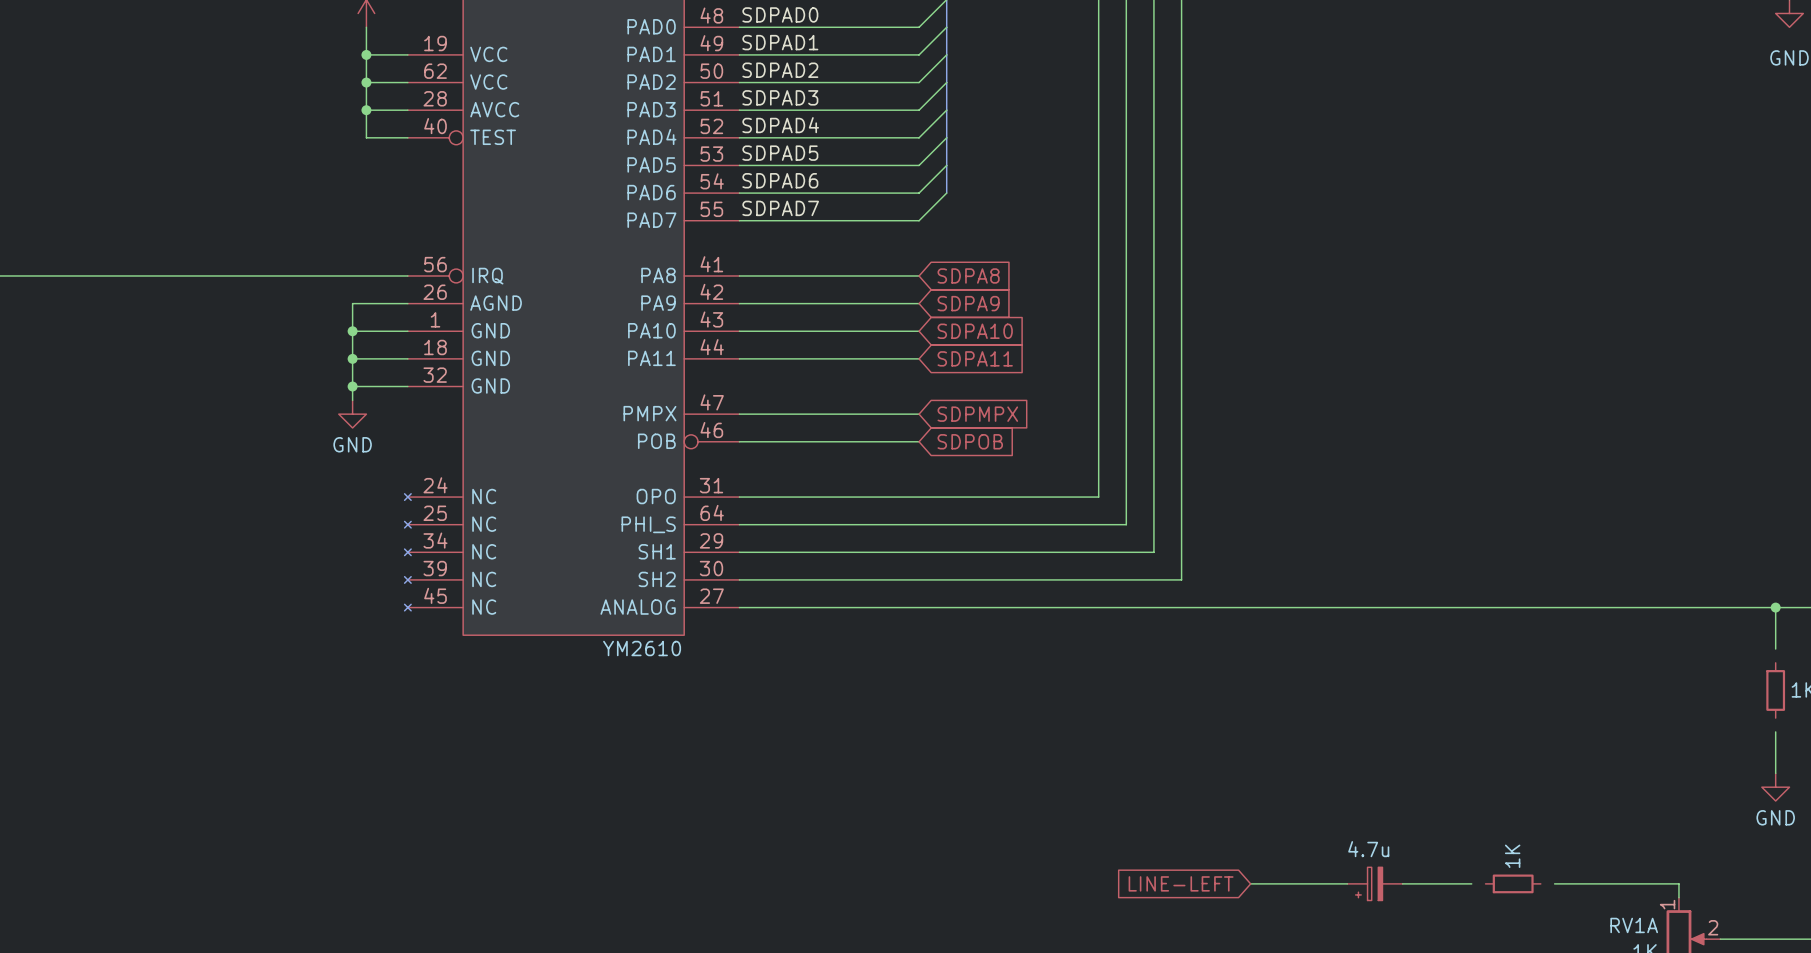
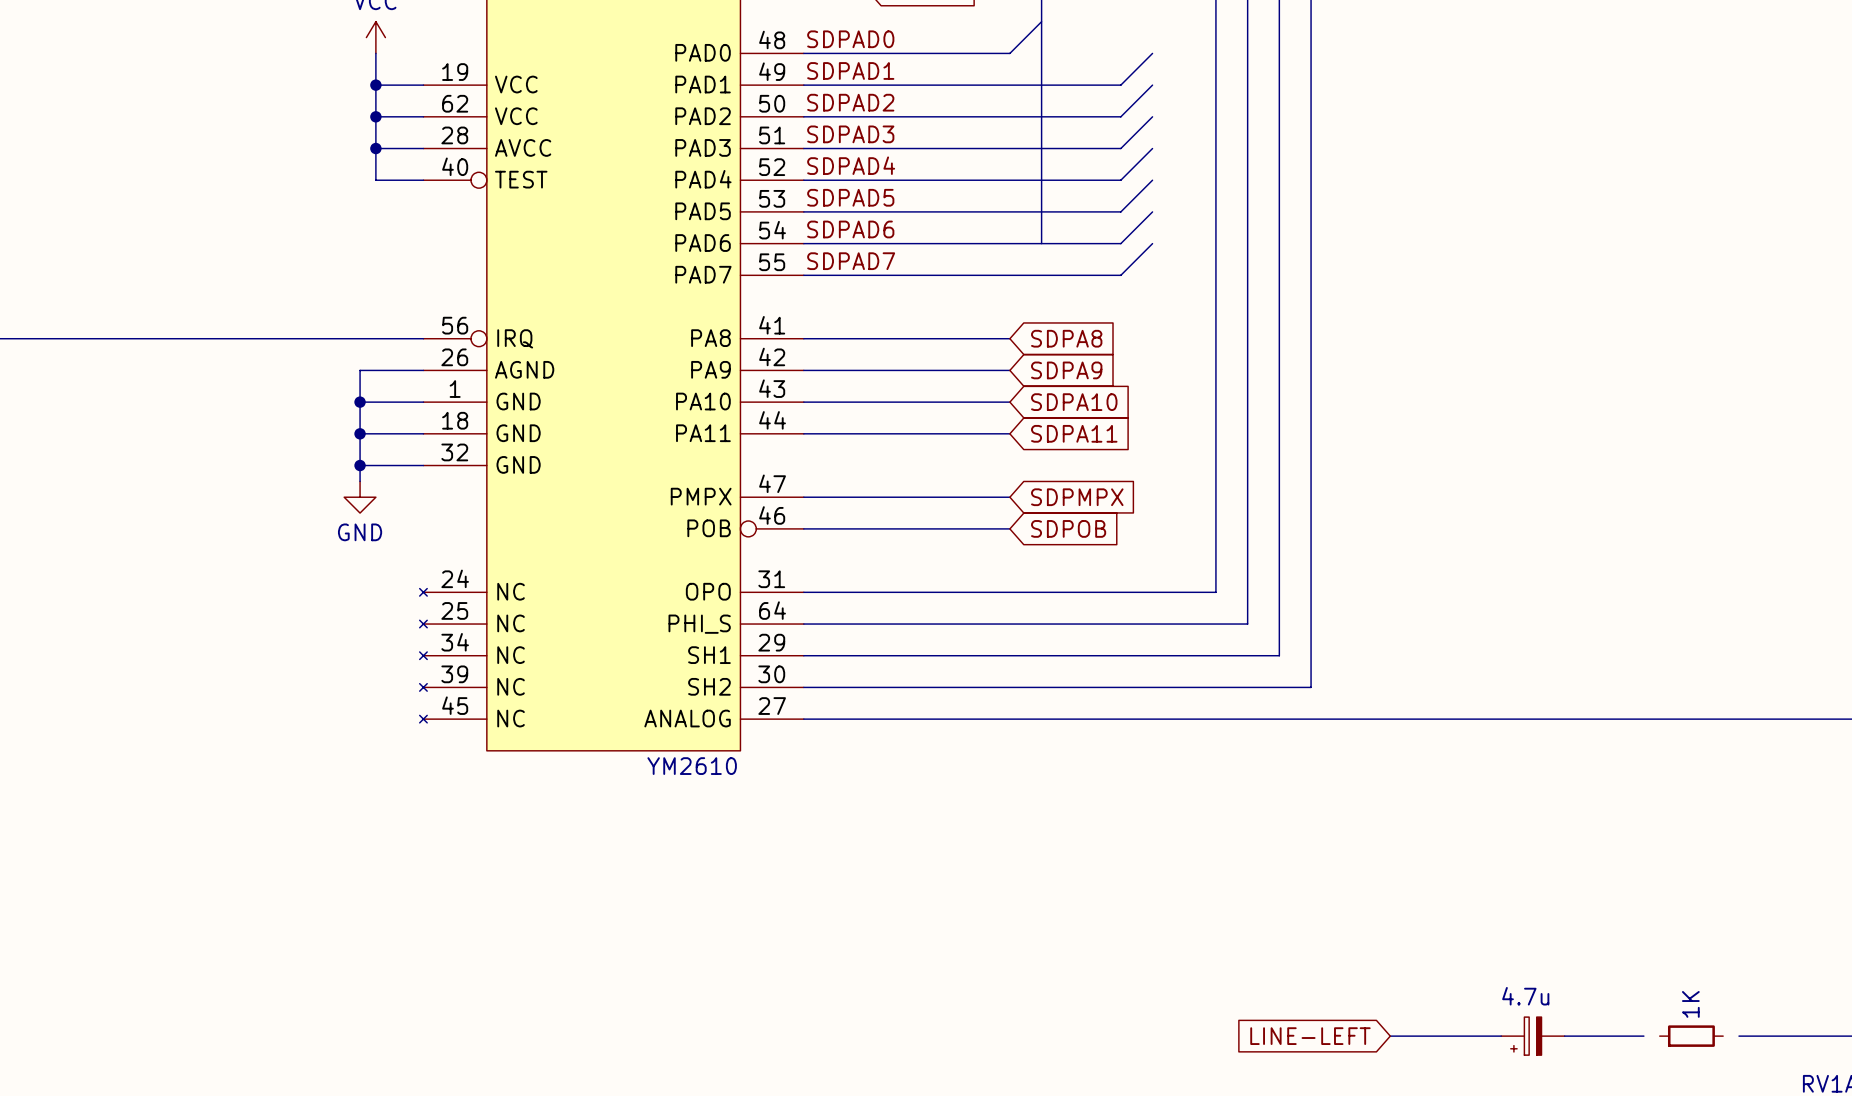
wire: (946, 27) (919, 54) -> (1152, 53) (1120, 85) (1009, 85)
wire: (946, 54) (919, 82) -> (1152, 85) (1120, 116) (1009, 116)
wire: (946, 82) (919, 110) -> (1152, 116) (1120, 148) (1009, 148)
wire: (946, 110) (919, 137) -> (1152, 148) (1120, 180) (1009, 180)
wire: (946, 137) (919, 165) -> (1152, 180) (1120, 211) (1009, 211)
wire: (946, 165) (919, 193) -> (1152, 211) (1120, 243) (1009, 243)
wire: (946, 193) (919, 220) -> (1152, 243) (1120, 275) (1009, 275)

